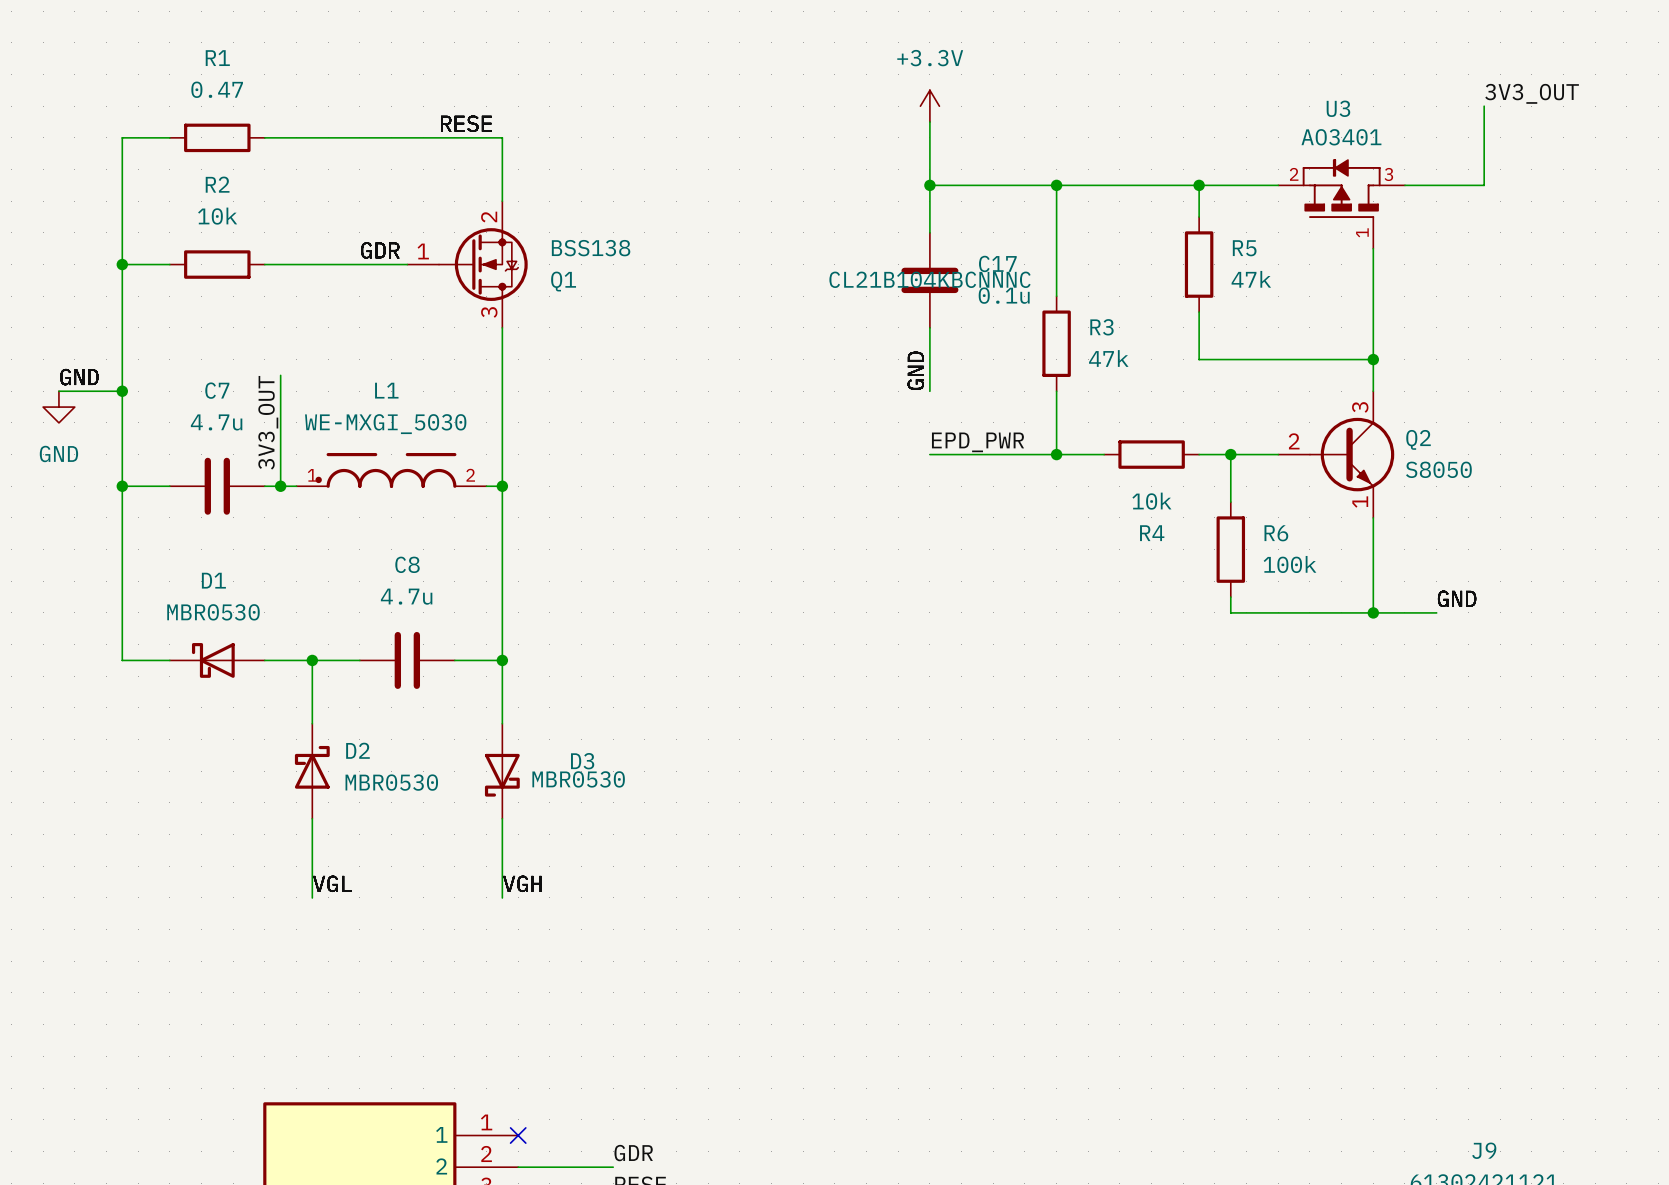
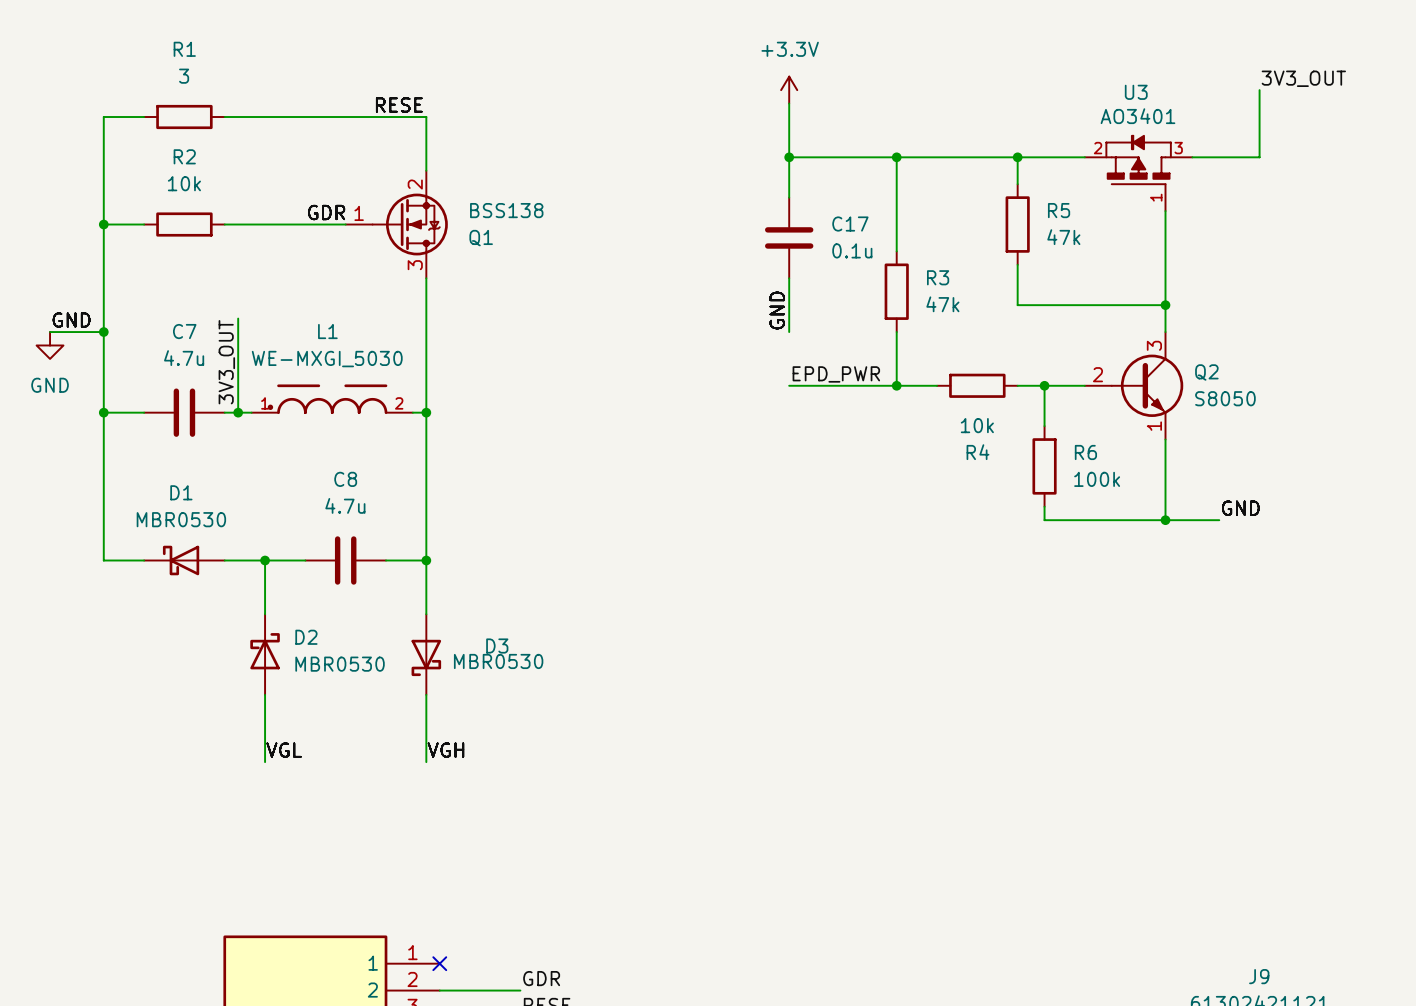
R1 value: 0.47 (217, 89) -> 3 (184, 76)
C17 text: CL21B104KBCNNNC (930, 279) -> none

